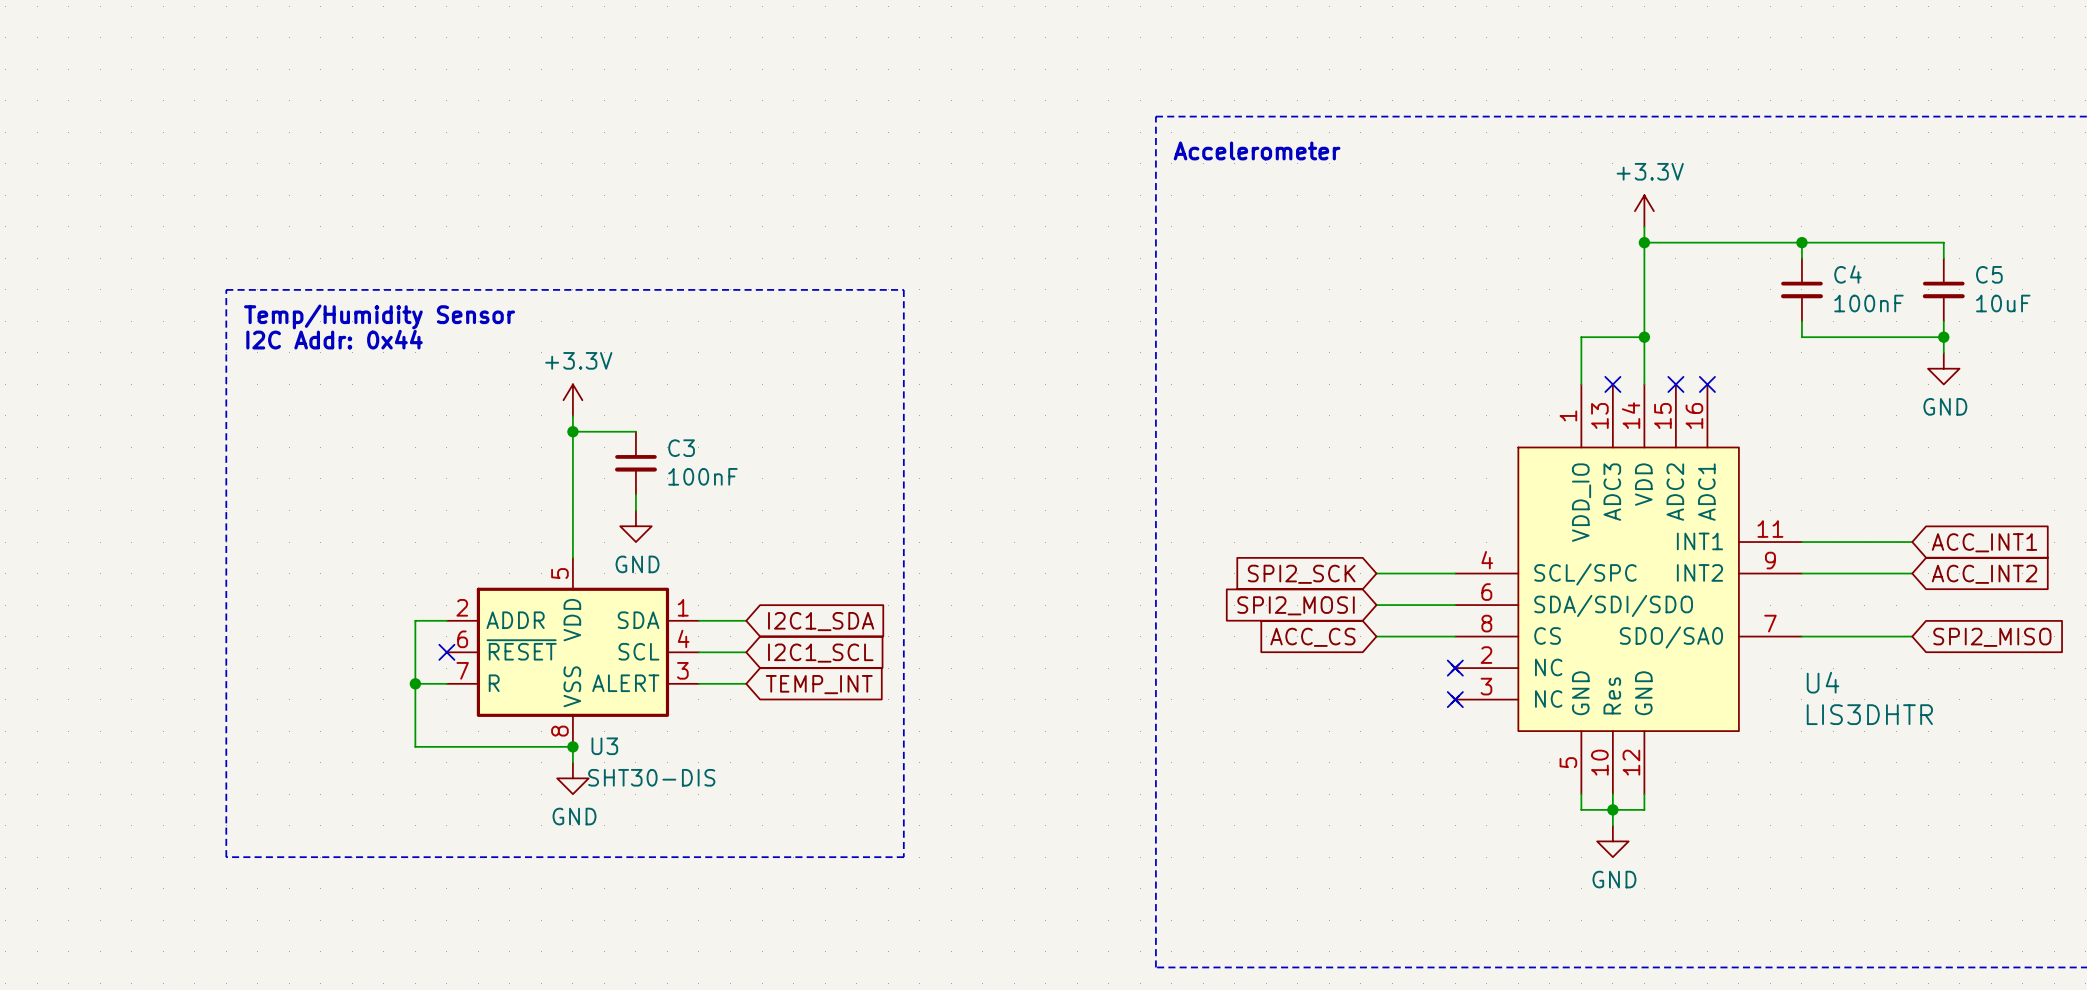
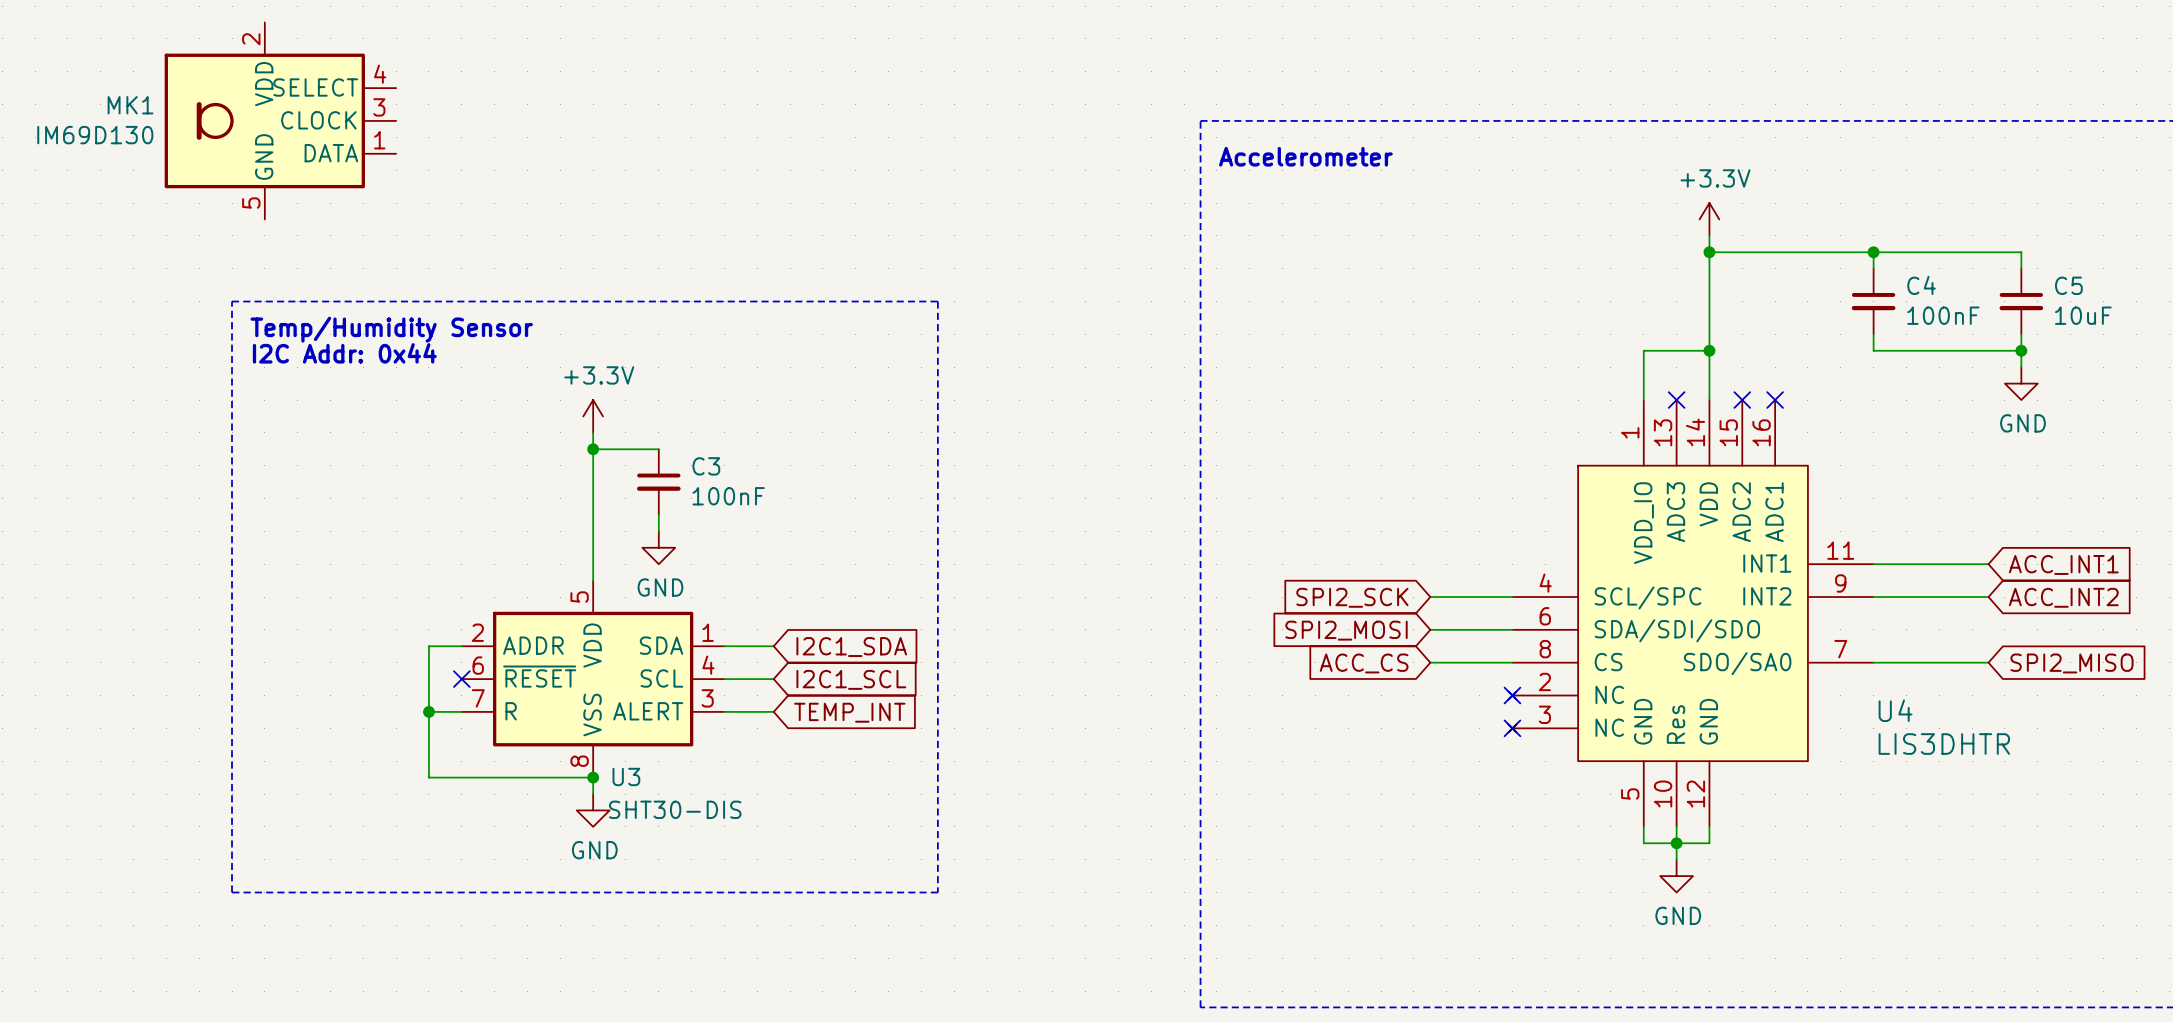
MK1: none -> IM69D130 (280, 120)

